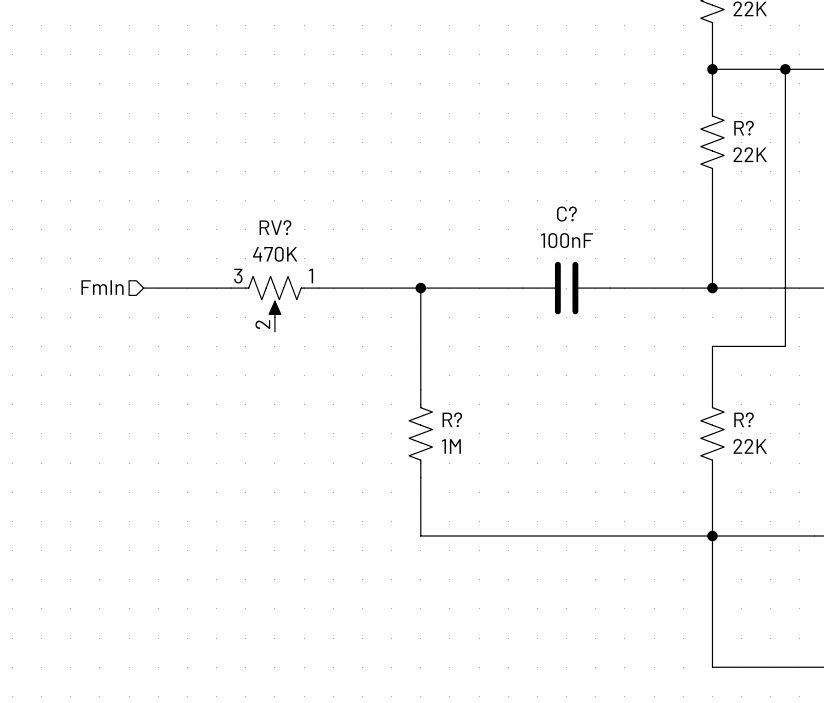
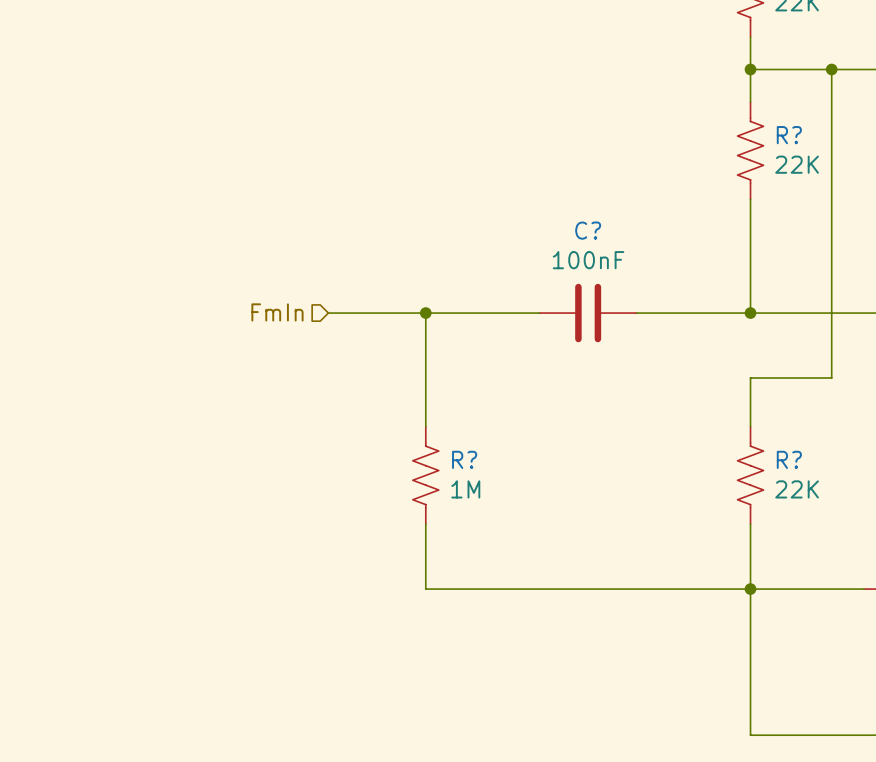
hierarchical label position: FmIn (102, 287) -> FmIn (277, 312)
wire: (143, 288) (231, 288) -> none
wire: (318, 288) (333, 288) -> none
RV?: 470K (274, 304) -> none

